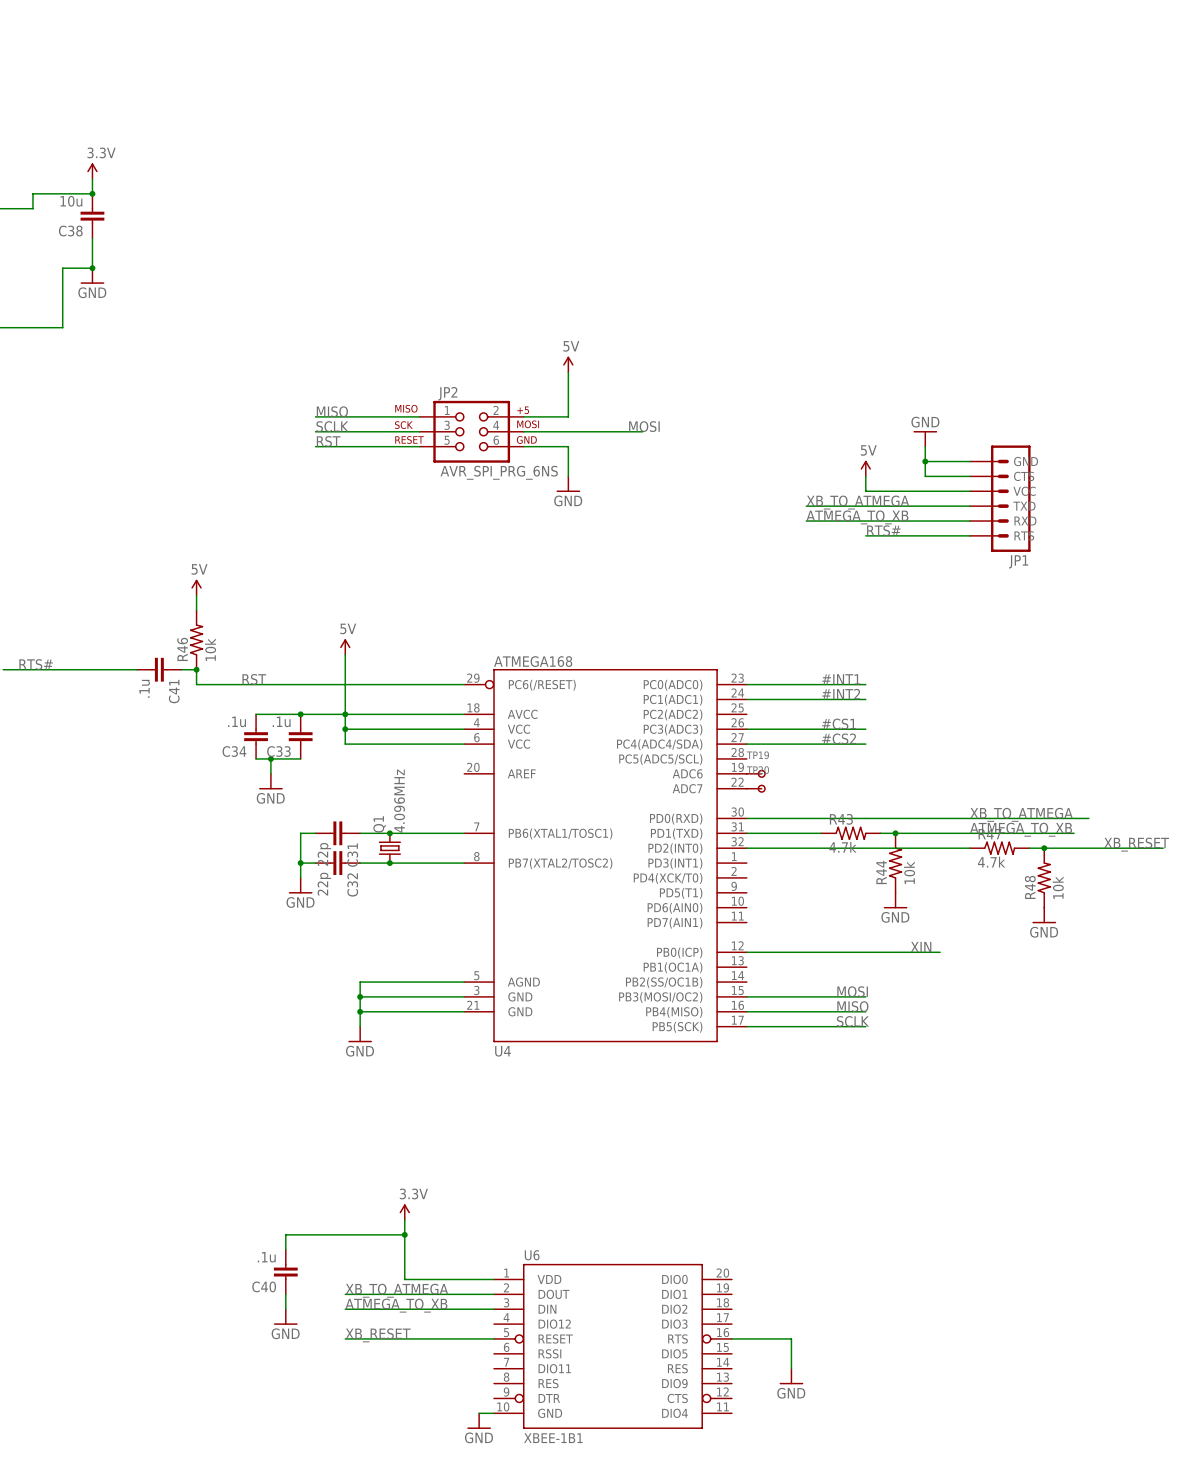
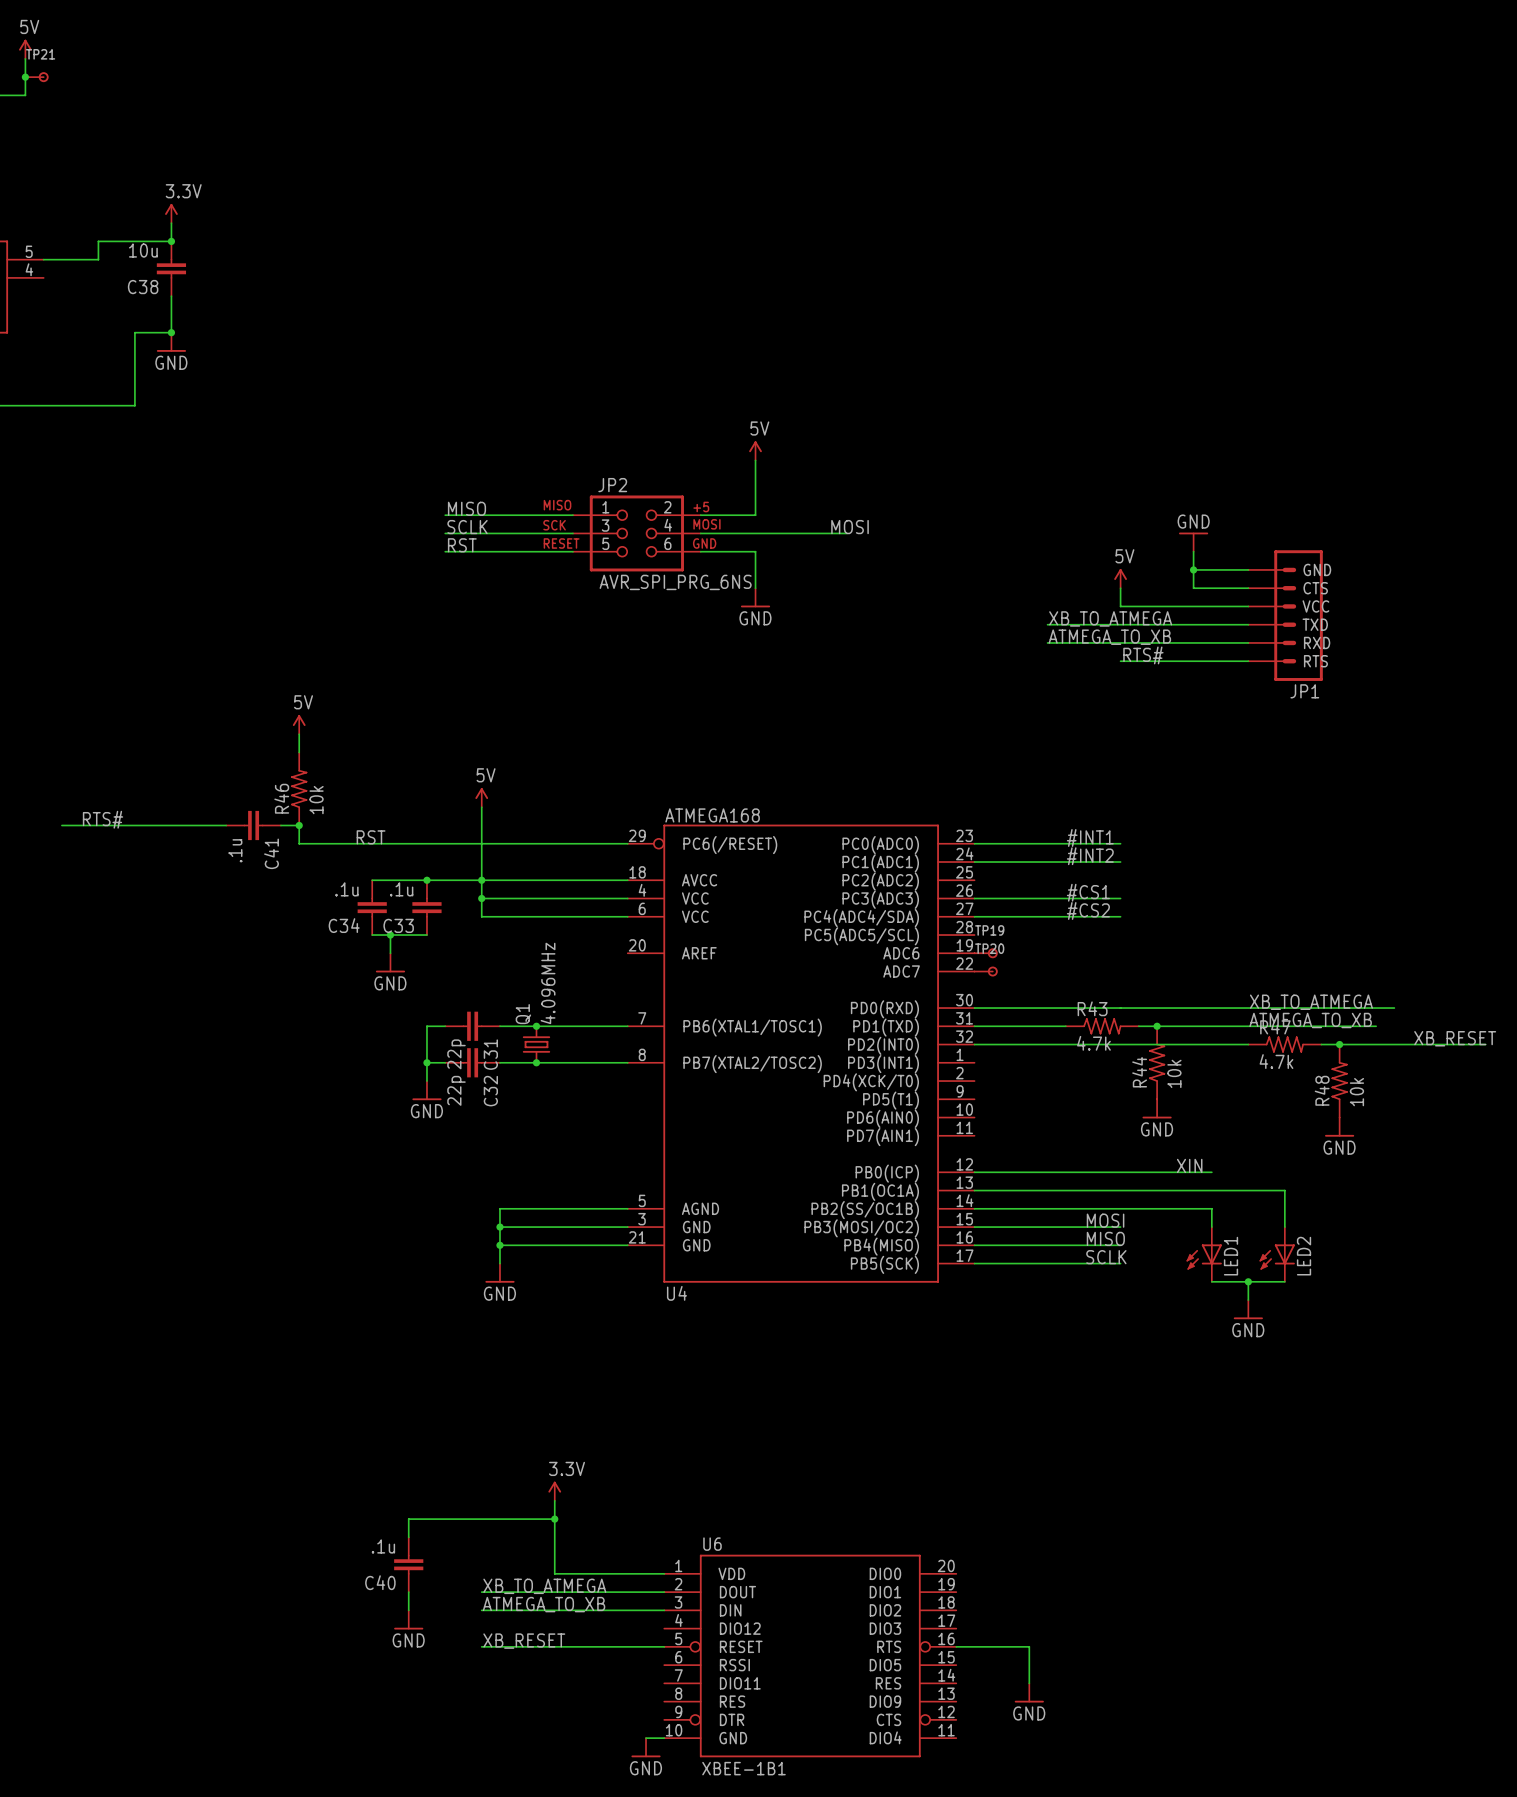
wire: none -> (974, 1190) (1284, 1190) (1284, 1227)
wire: none -> (974, 1208) (1211, 1208) (1211, 1227)
LED1: none -> (1204, 1254)
LED2: none -> (1277, 1254)
wire: none -> (1211, 1281) (1284, 1281)
wire: none -> (1248, 1281) (1248, 1300)
junction: none -> (1248, 1281)
power symbol: none -> GND (1248, 1309)

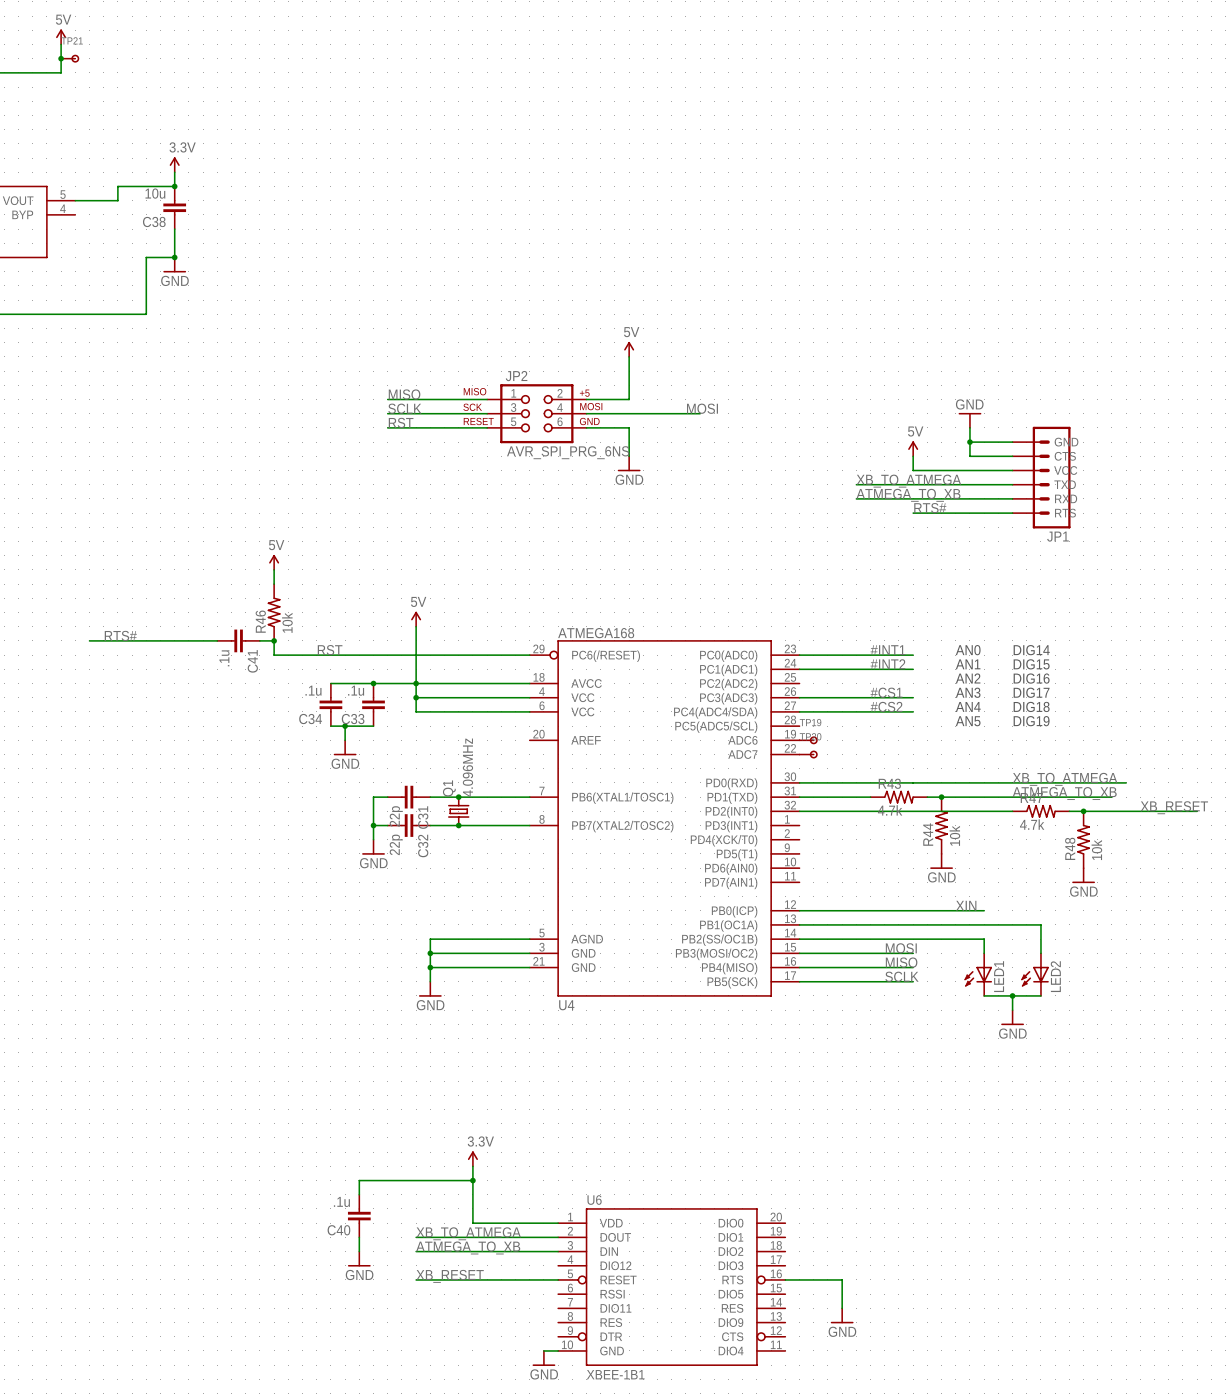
text: none -> AN0 (968, 650)
text: none -> DIG14 (1031, 650)
text: none -> AN1 (968, 664)
text: none -> DIG15 (1031, 664)
text: none -> AN2 (968, 678)
text: none -> DIG16 (1031, 678)
text: none -> AN3 (968, 692)
text: none -> DIG17 (1031, 692)
text: none -> AN4 (968, 706)
text: none -> DIG18 (1031, 706)
text: none -> AN5 (968, 721)
text: none -> DIG19 (1031, 721)

